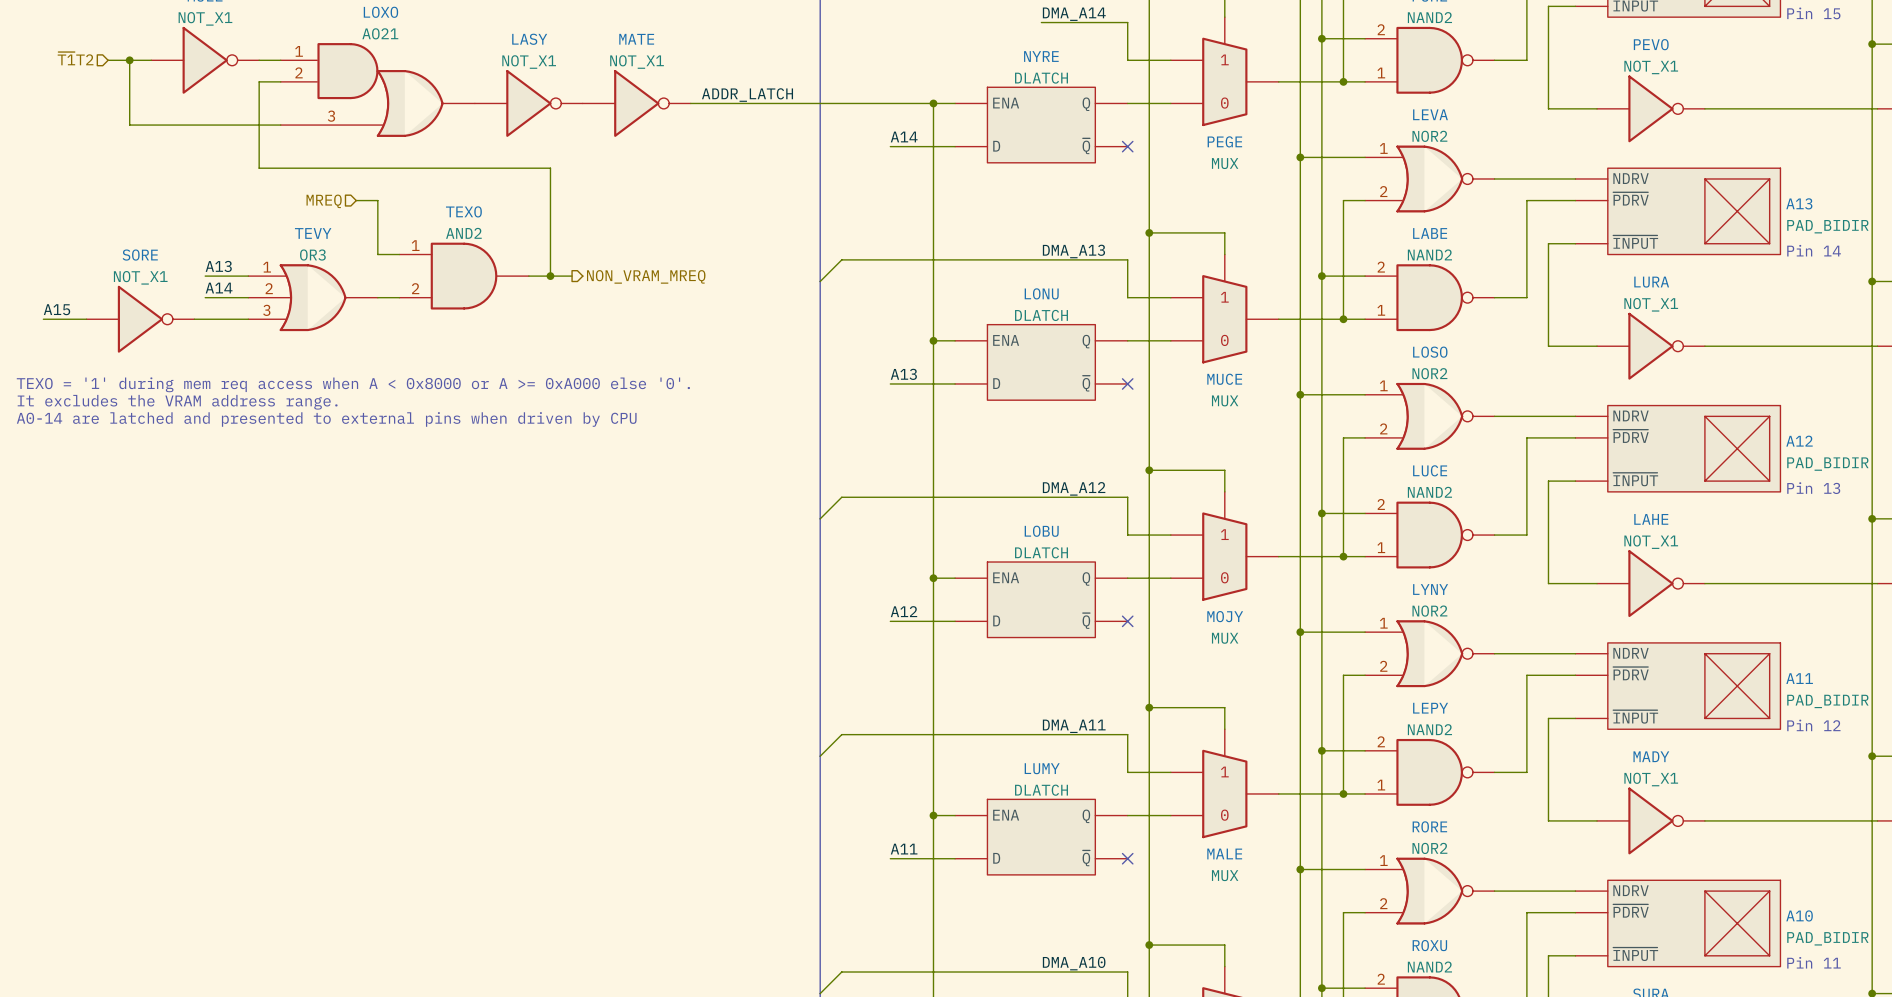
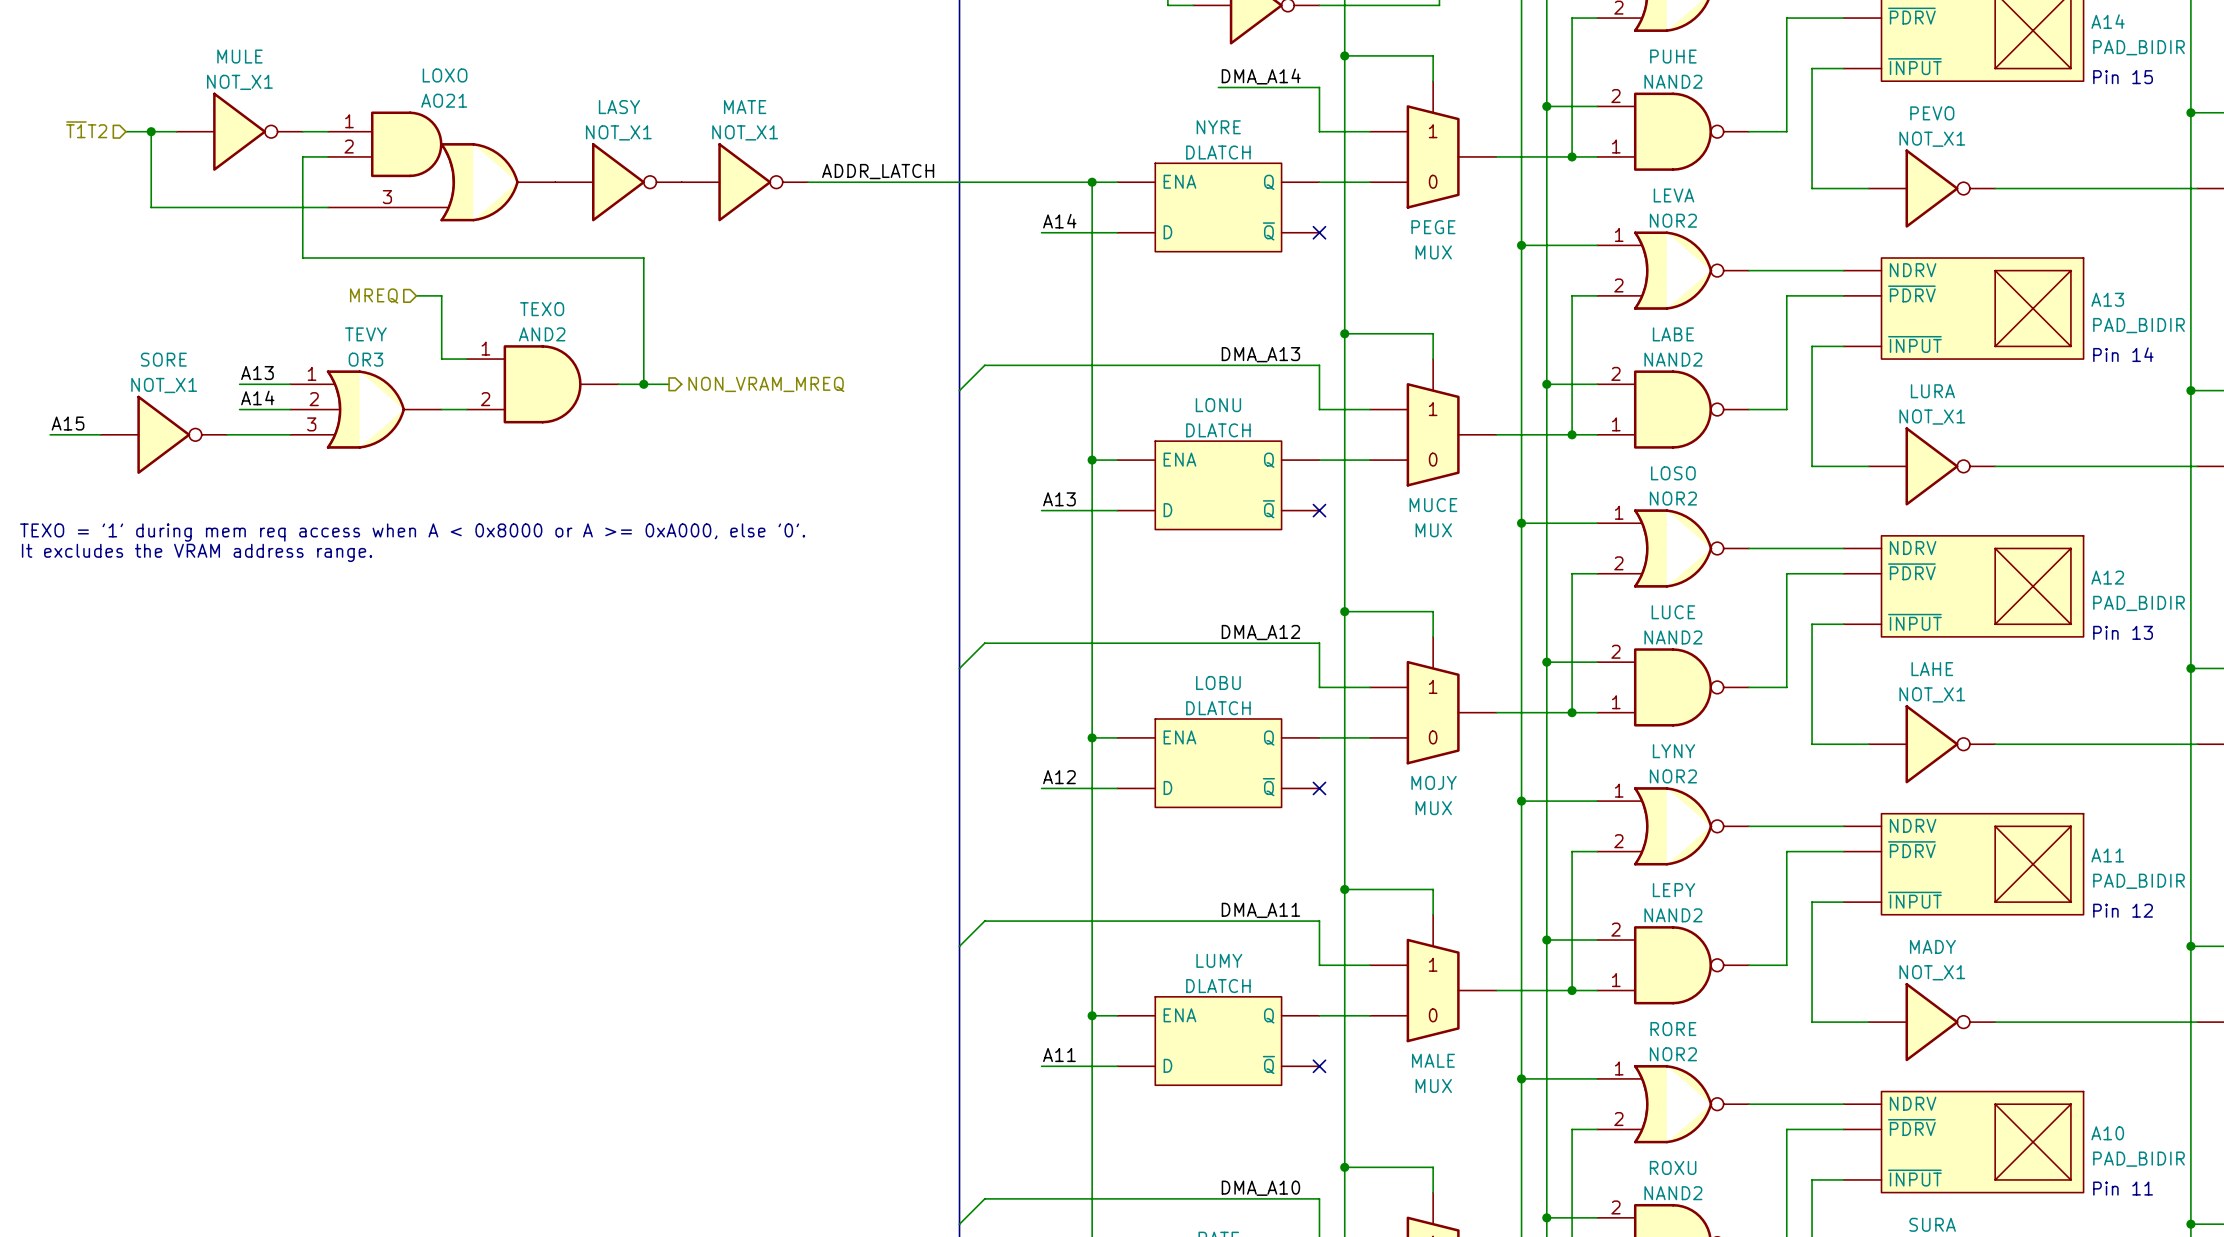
text: TEXO = '1' during mem req access when A < 0x8000 or A >= 0xA000 else '0'. (353, 384) -> none
text: It excludes the VRAM address range. (177, 402) -> TEXO = '1' during mem req access when A < 0x8000 or A >= 0xA000, else '0'. (412, 532)
text: A0-14 are latched and presented to external pins when driven by CPU (326, 419) -> It excludes the VRAM address range. (197, 552)

